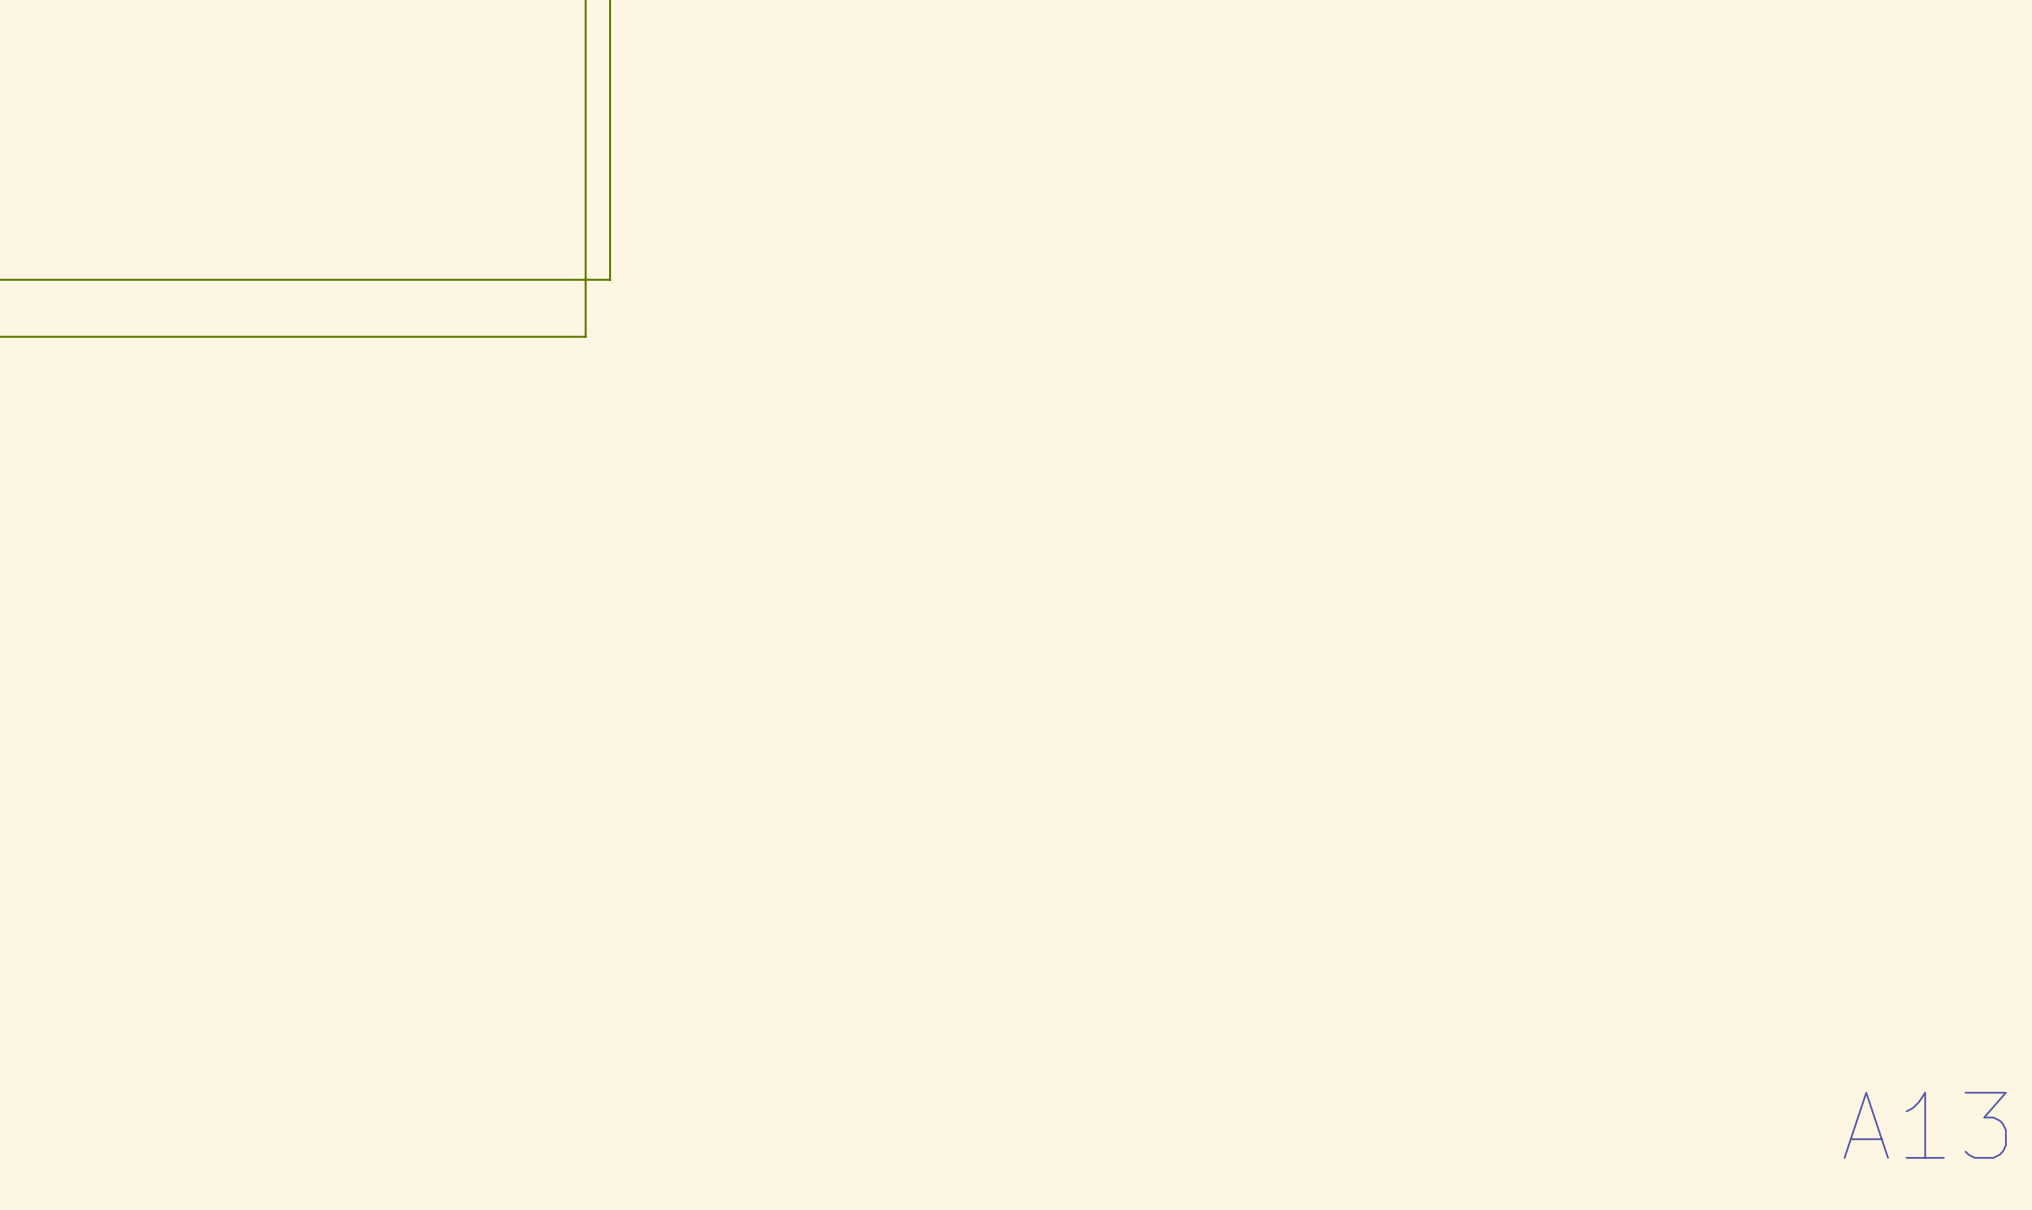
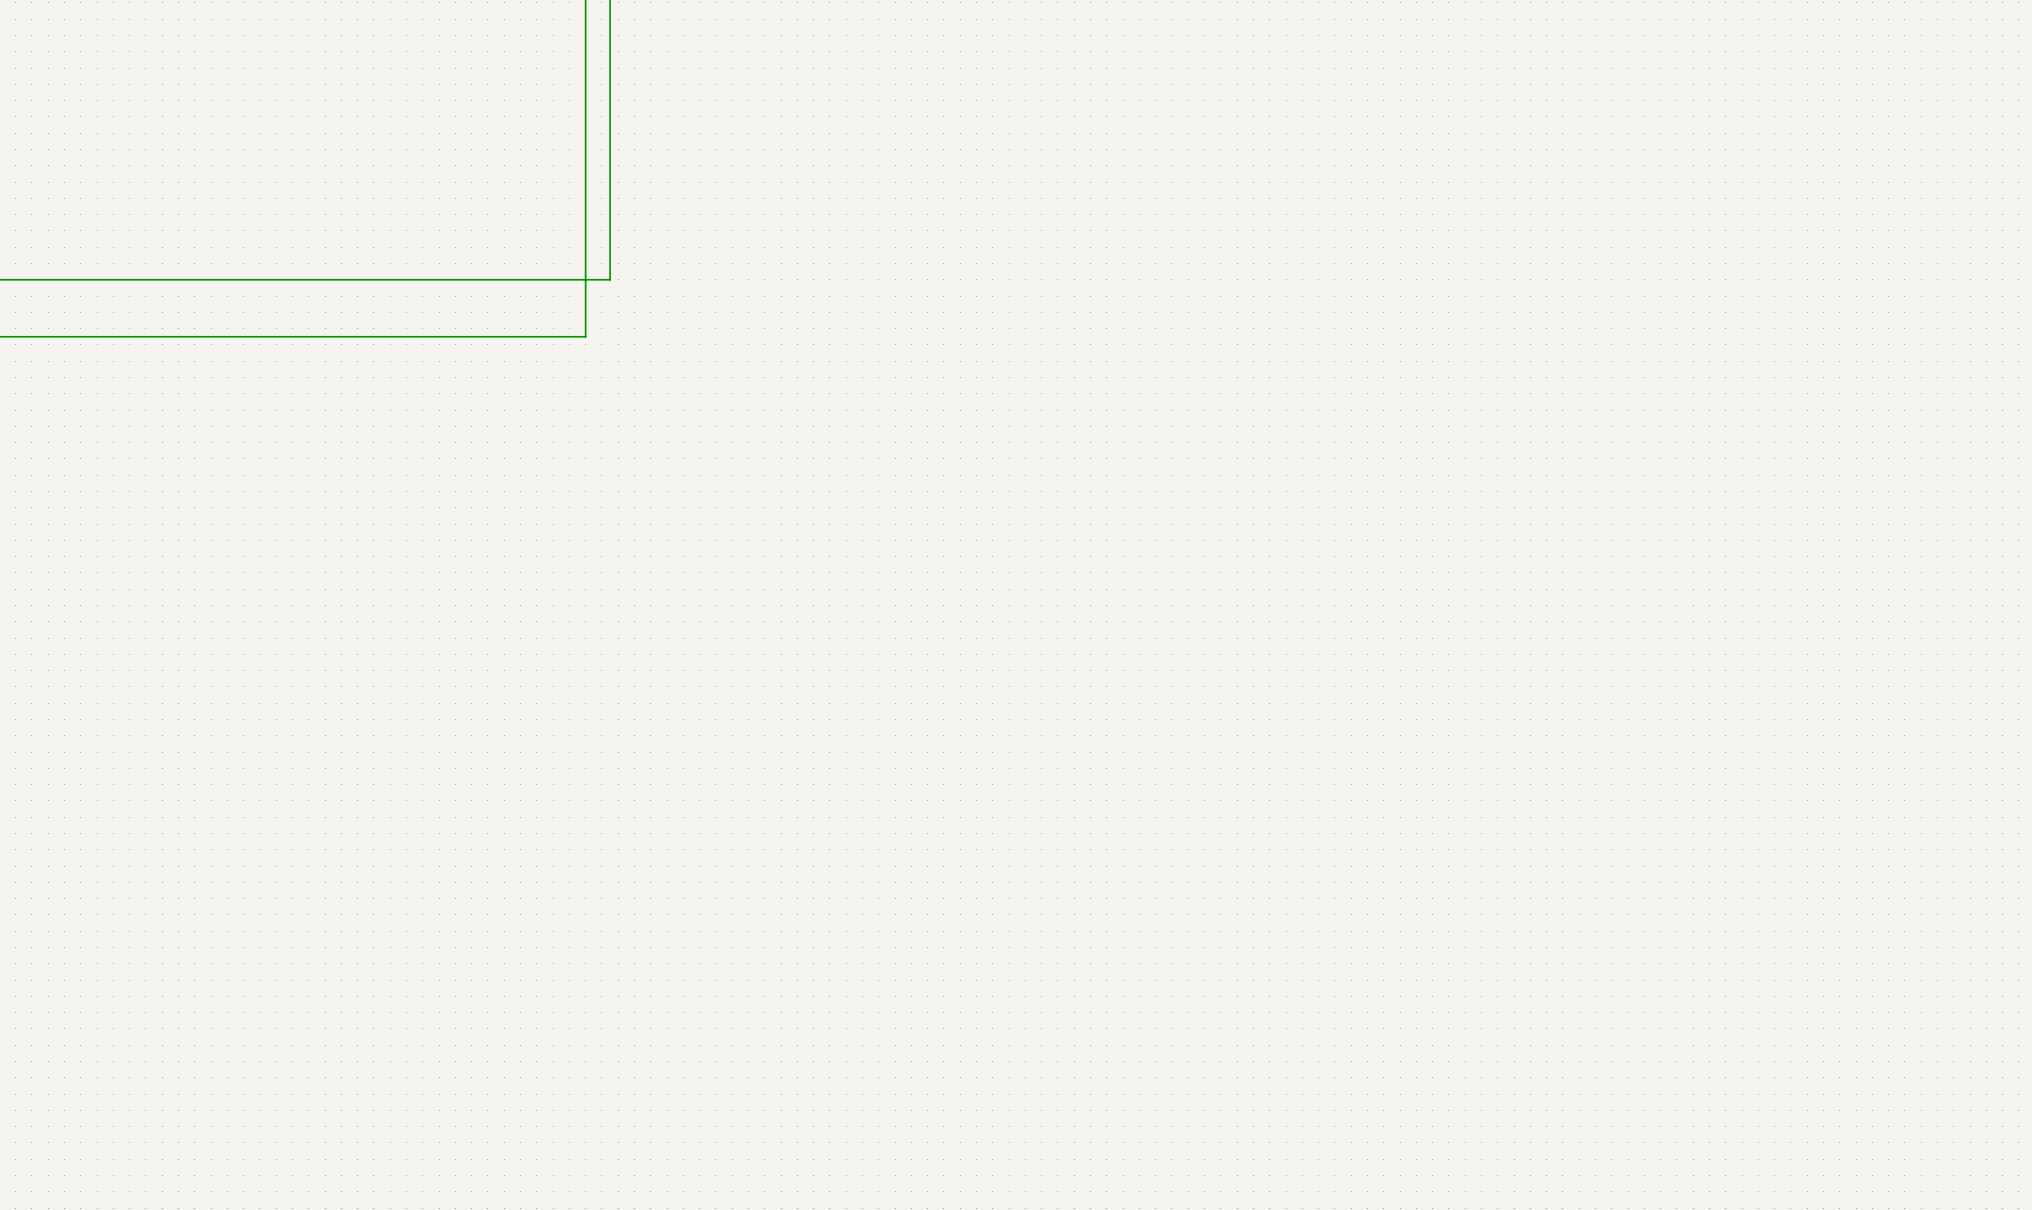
text: A13 (1925, 1125) -> none

